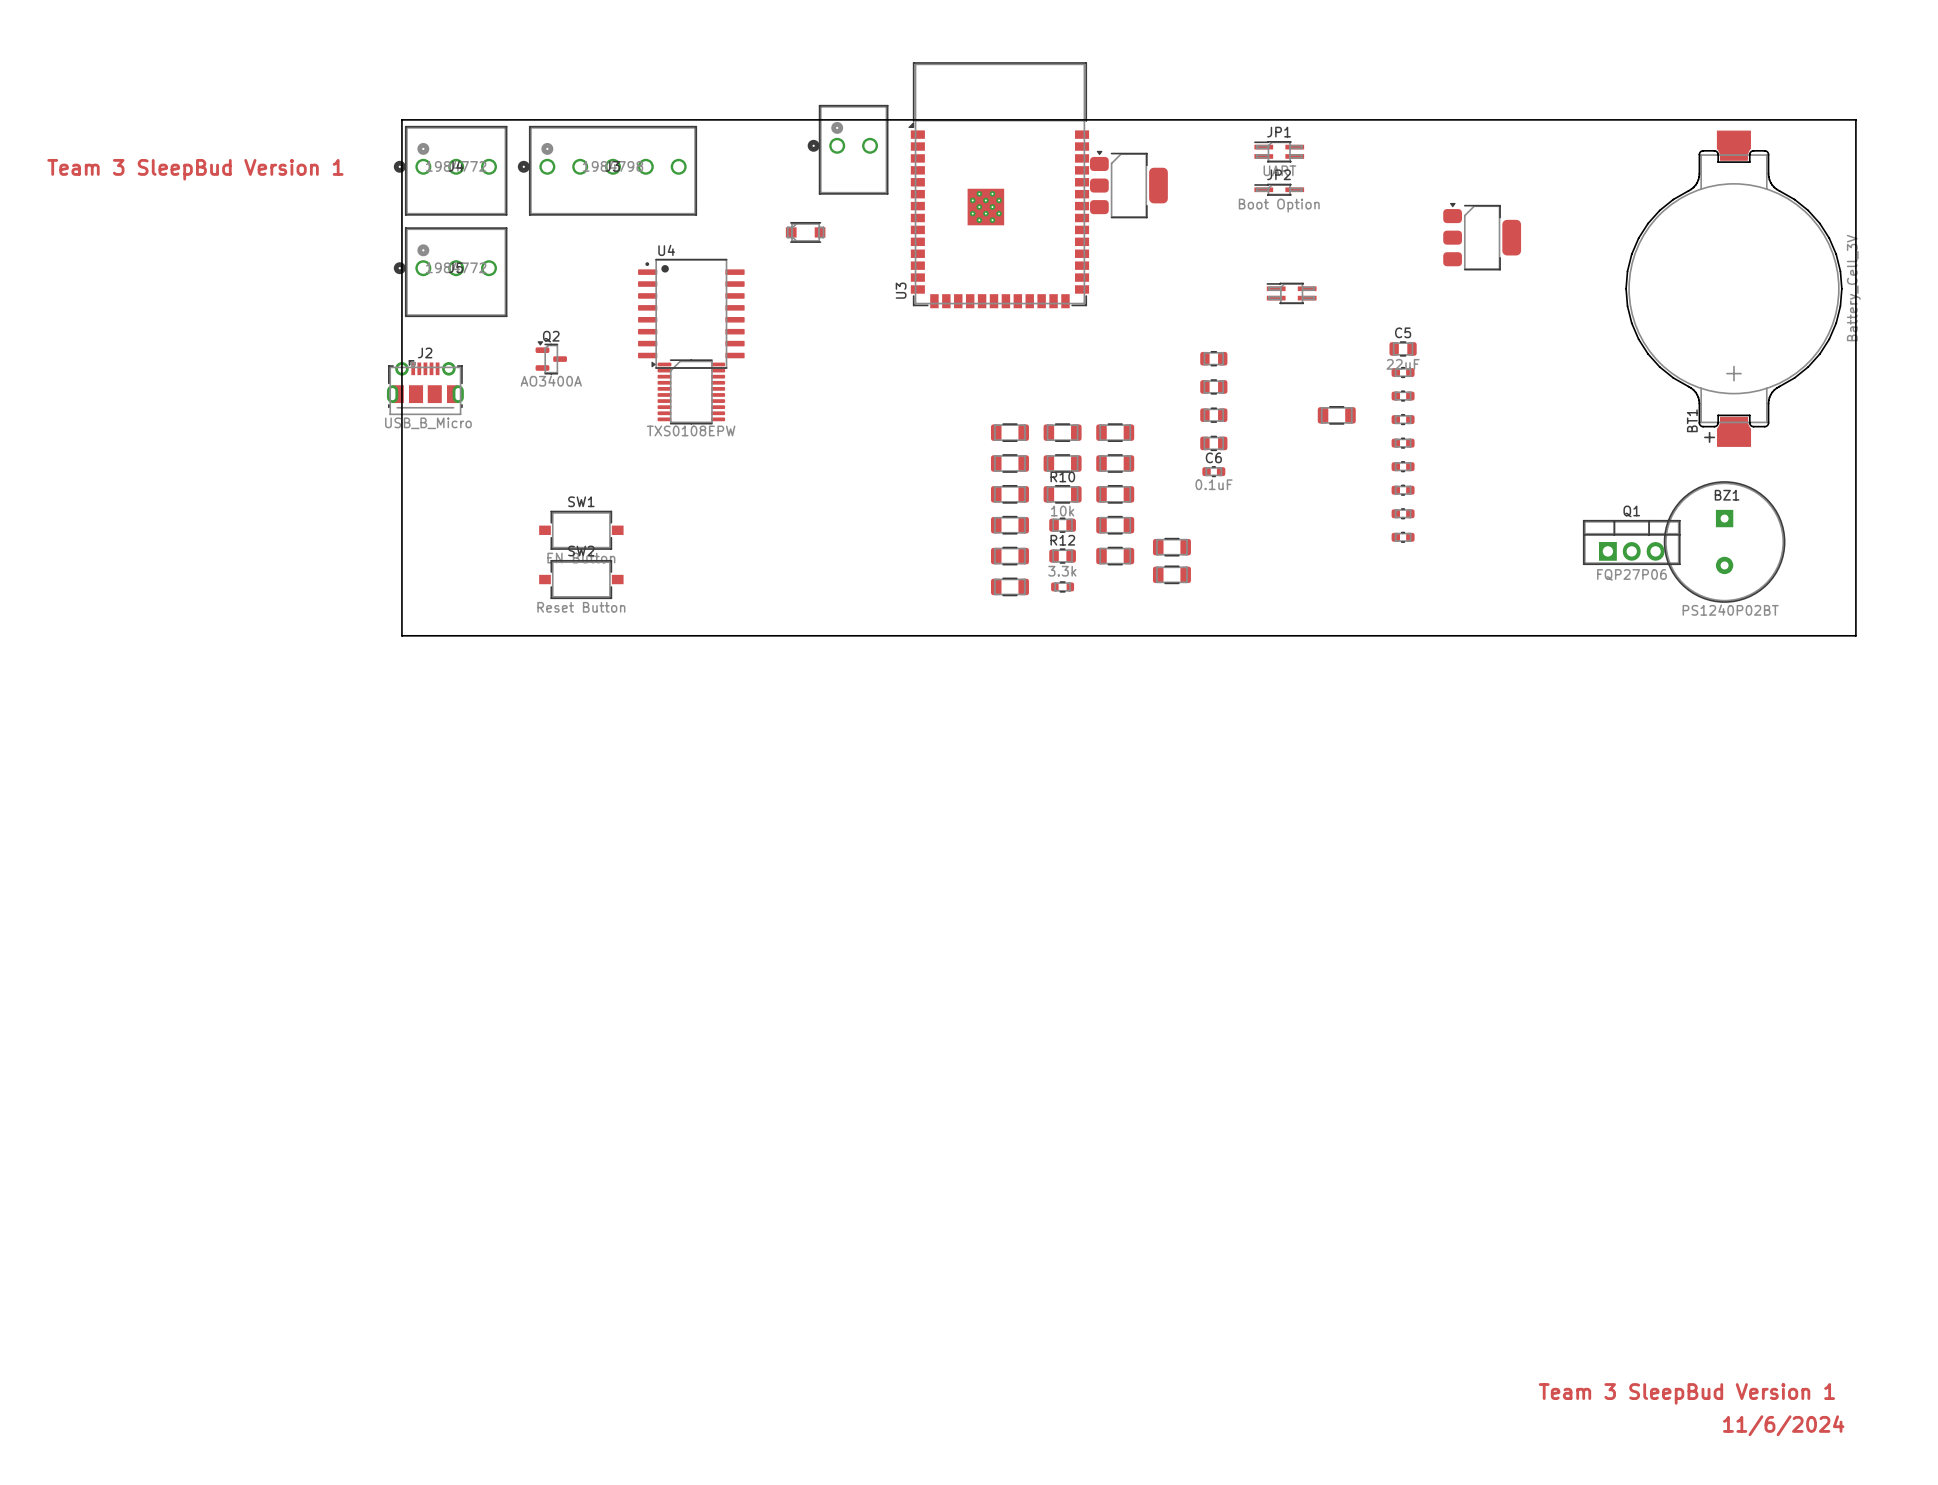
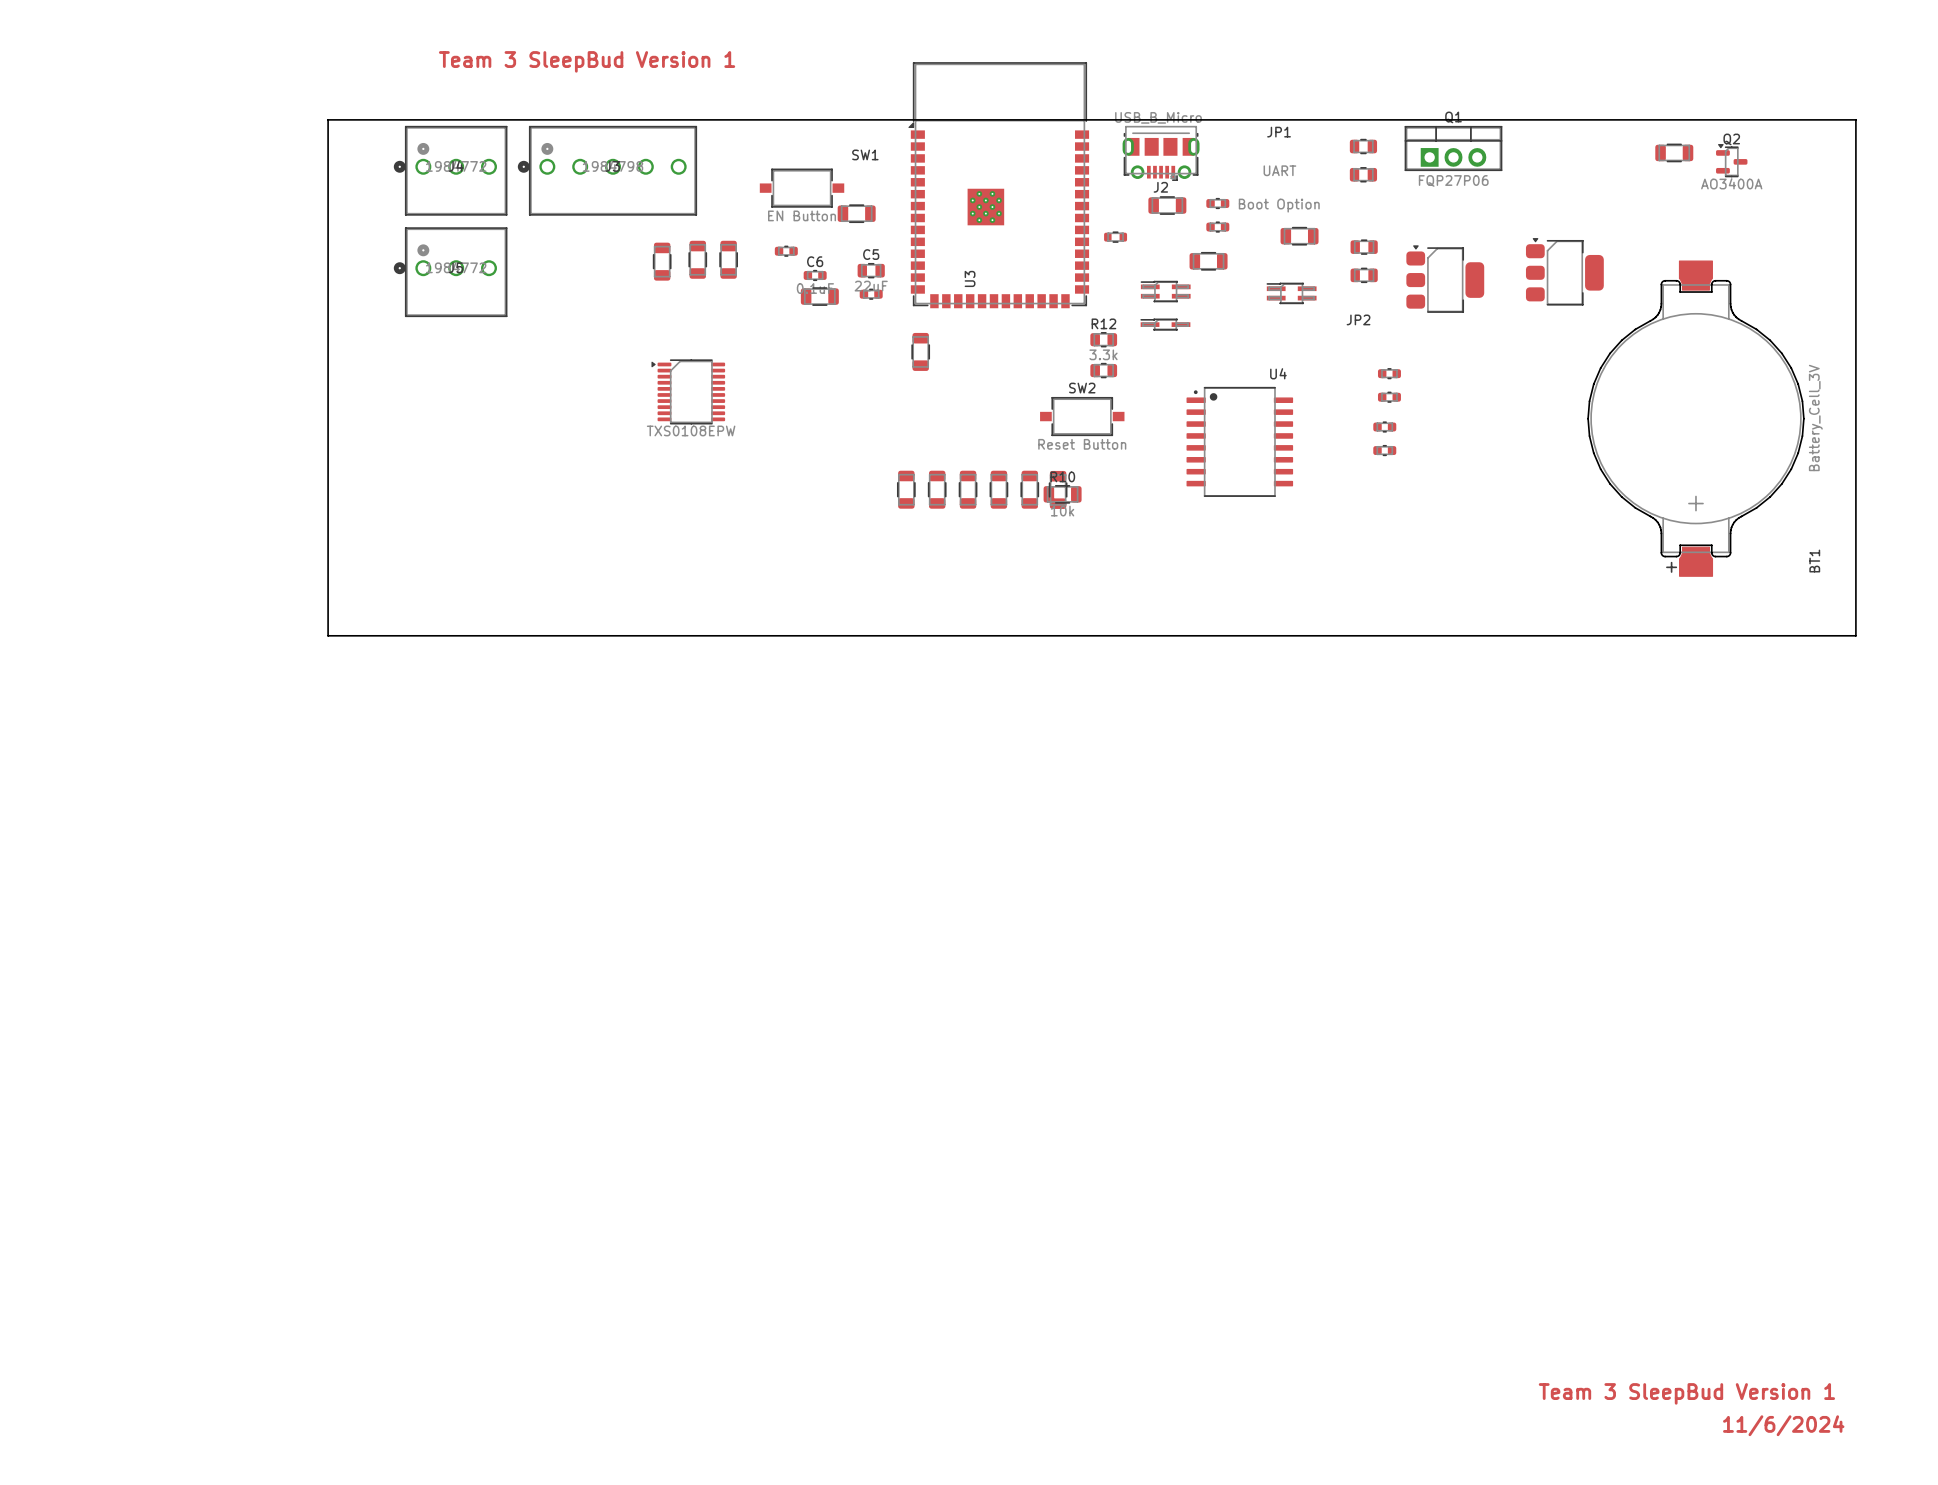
text: none -> Team 3 SleepBud Version 1 (587, 61)
board edge: (401, 119) (401, 635) -> (401, 119) (328, 119) (328, 635) (401, 635)
part: none -> (1363, 146)
part: (848, 149) -> none
JP1 position: (1279, 151) -> (1165, 291)
part: none -> (1674, 152)
text: Team 3 SleepBud Version 1 (195, 169) -> none
JP2 name position: JP2 (1279, 174) -> JP2 (1358, 319)
part: none -> (1363, 174)
part: (1128, 184) -> none
JP2 position: (1279, 189) -> (1165, 324)
part: none -> (1217, 203)
part: none -> (1167, 205)
part: none -> (856, 213)
part: none -> (1217, 227)
part: (805, 232) -> none
part: none -> (1299, 236)
part: (1482, 236) -> none
part: none -> (1115, 237)
part: none -> (1364, 247)
U4 name position: U4 (666, 250) -> U4 (1278, 373)
part: none -> (786, 251)
part: none -> (697, 259)
part: none -> (728, 259)
part: none -> (662, 261)
part: none -> (1208, 261)
part: none -> (1564, 271)
part: none -> (1364, 275)
part: none -> (1445, 278)
BT1 position: (1733, 288) -> (1695, 418)
U3 name position: U3 (901, 290) -> U3 (970, 278)
part: none -> (871, 294)
part: none -> (819, 296)
U4 position: (691, 313) -> (1239, 441)
C5 position: (1403, 348) -> (871, 270)
part: none -> (920, 351)
Q2 position: (551, 357) -> (1731, 160)
part: (1213, 358) -> none
part: (1403, 372) -> none
part: none -> (1389, 373)
part: (1213, 386) -> none
J2 rotation: 0° (425, 387) -> 180° (1161, 153)
J2 position: (425, 387) -> (1161, 153)
part: (1403, 396) -> none
part: none -> (1389, 397)
part: (1213, 415) -> none
part: (1336, 415) -> none
part: (1403, 419) -> none
BT1 name position: BT1 (1692, 420) -> BT1 (1814, 561)
part: none -> (1384, 427)
part: (1009, 432) -> none
part: (1062, 432) -> none
part: (1115, 432) -> none
part: (1213, 443) -> none
part: (1403, 443) -> none
part: none -> (1384, 450)
part: (1009, 463) -> none
part: (1062, 463) -> none
part: (1115, 463) -> none
part: (1403, 466) -> none
C6 position: (1213, 471) -> (815, 275)
part: none -> (906, 489)
part: none -> (937, 489)
part: none -> (968, 489)
part: none -> (998, 489)
part: none -> (1029, 489)
part: none -> (1058, 489)
part: (1403, 490) -> none
part: (1009, 494) -> none
part: (1115, 494) -> none
SW1 name position: SW1 (581, 501) -> SW1 (865, 154)
part: (1403, 513) -> none
part: (1009, 525) -> none
part position: (1062, 525) -> (1103, 370)
part: (1115, 525) -> none
SW1 position: (581, 530) -> (802, 188)
part: (1403, 537) -> none
Q1 position: (1631, 542) -> (1453, 148)
BZ1: PS1240P02BT (1724, 542) -> none
part: (1171, 547) -> none
part: (1009, 556) -> none
R12 position: (1062, 556) -> (1103, 339)
part: (1115, 556) -> none
part: (1171, 574) -> none
SW2 position: (581, 579) -> (1082, 416)
part: (1009, 586) -> none
part: (1062, 586) -> none

